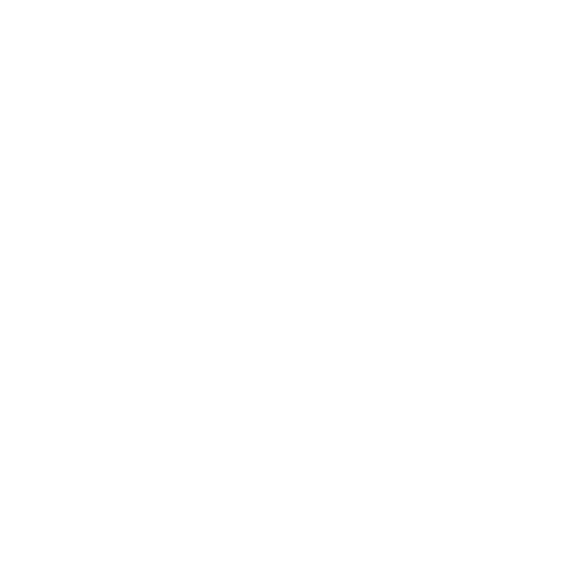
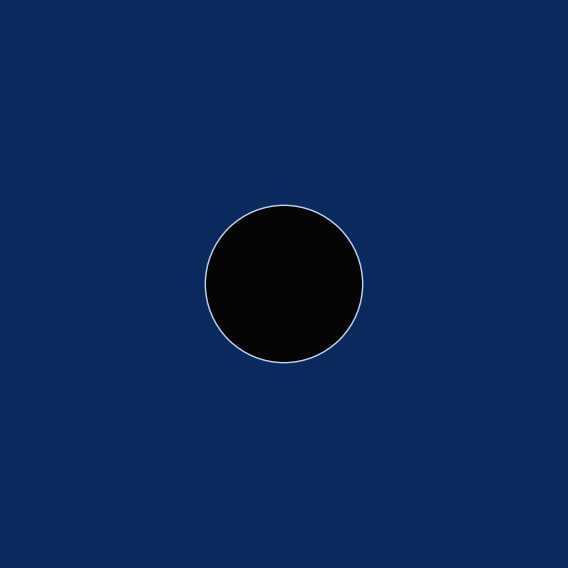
hole: none -> (283, 283)

